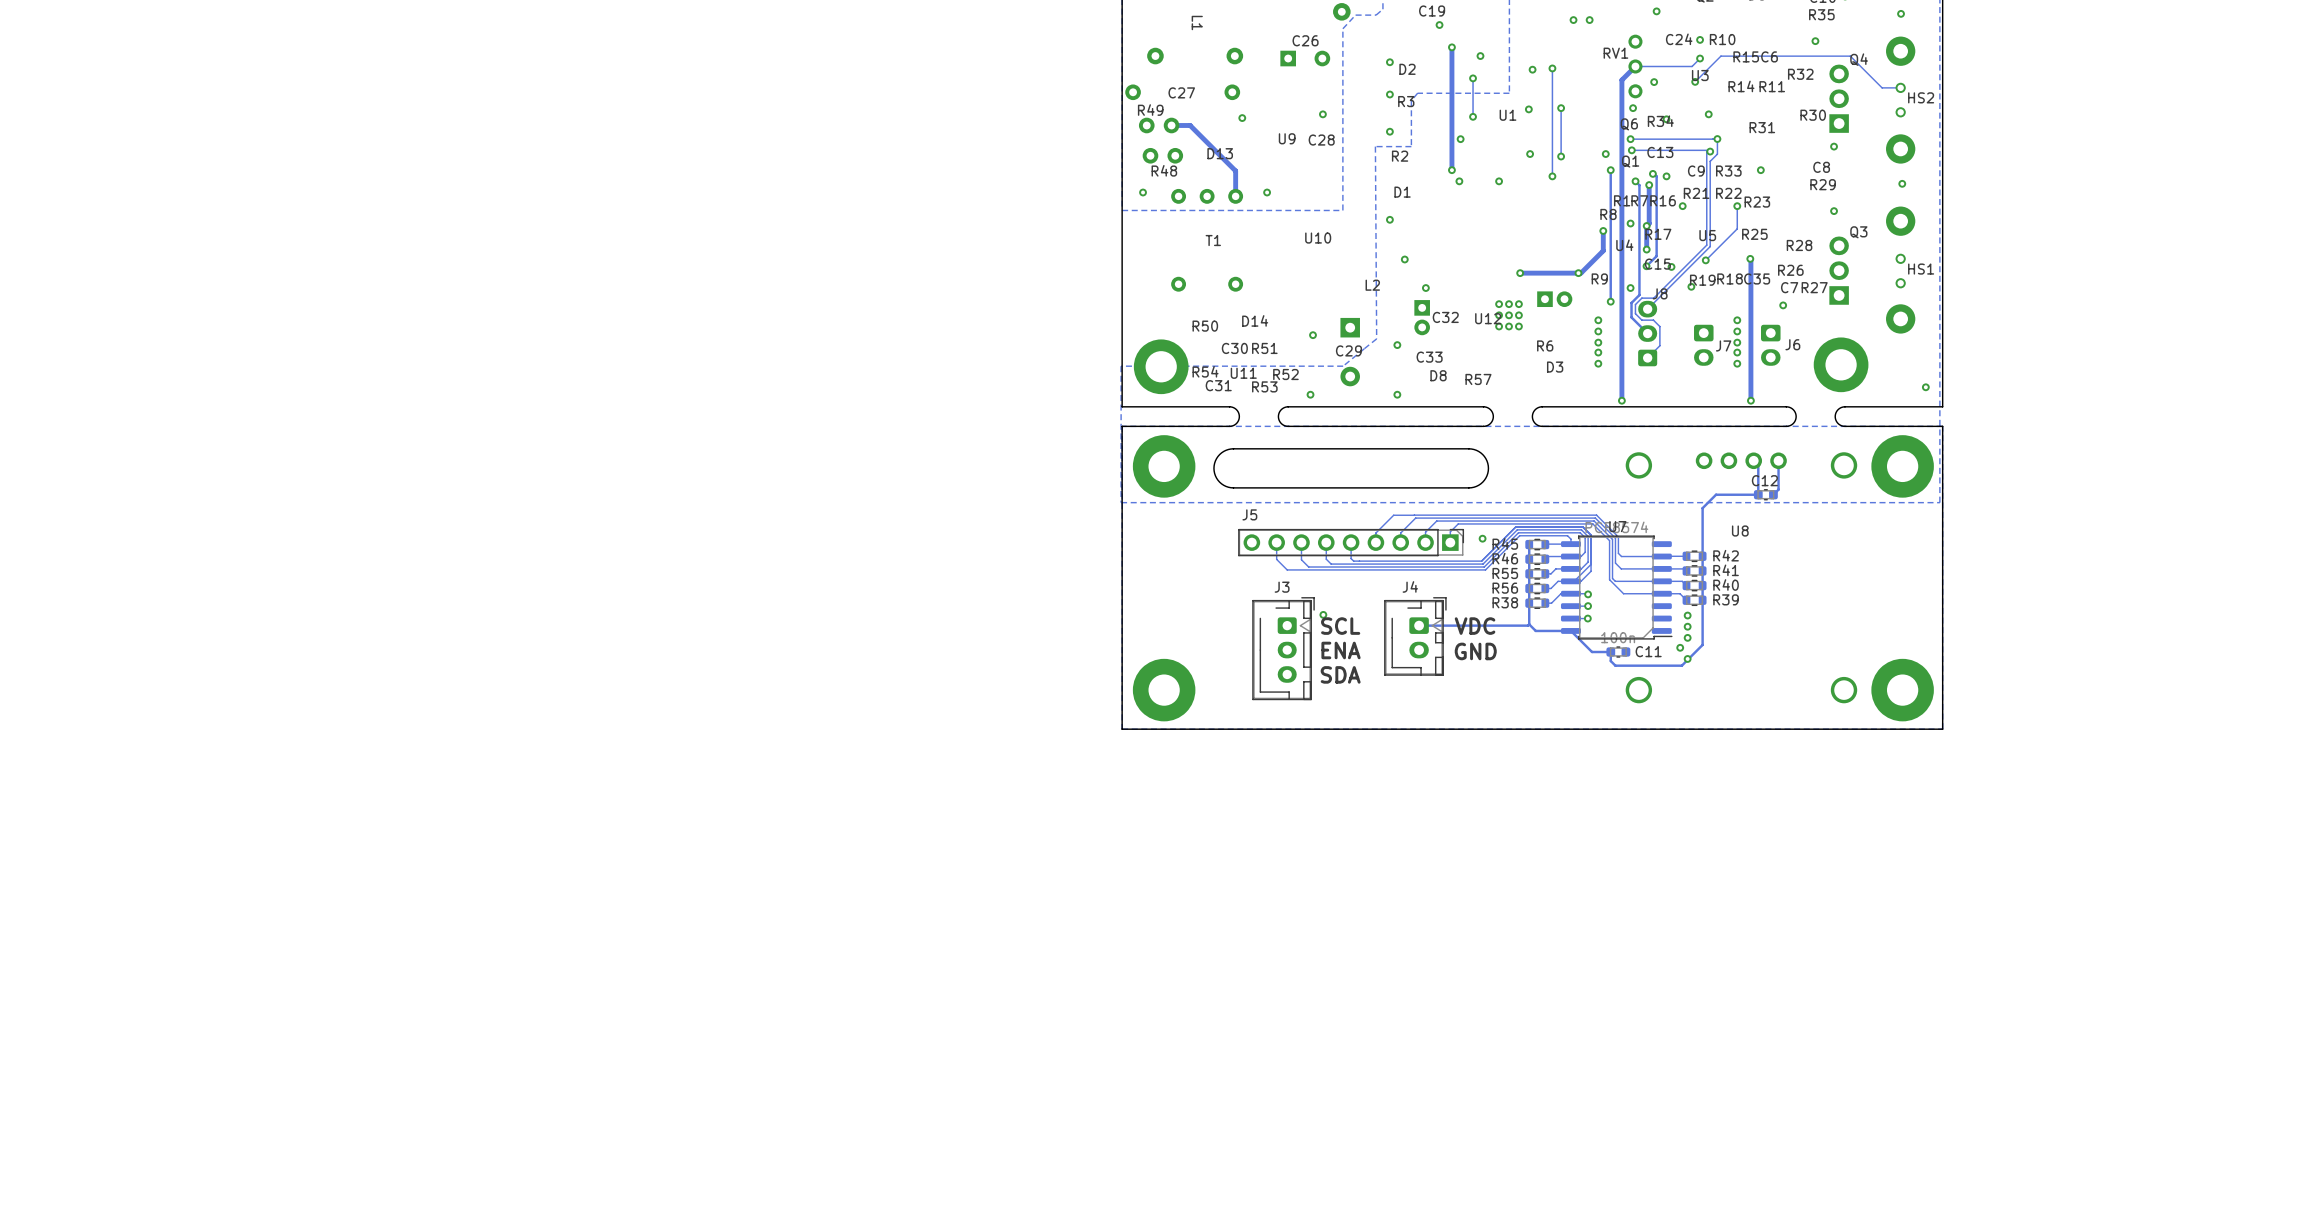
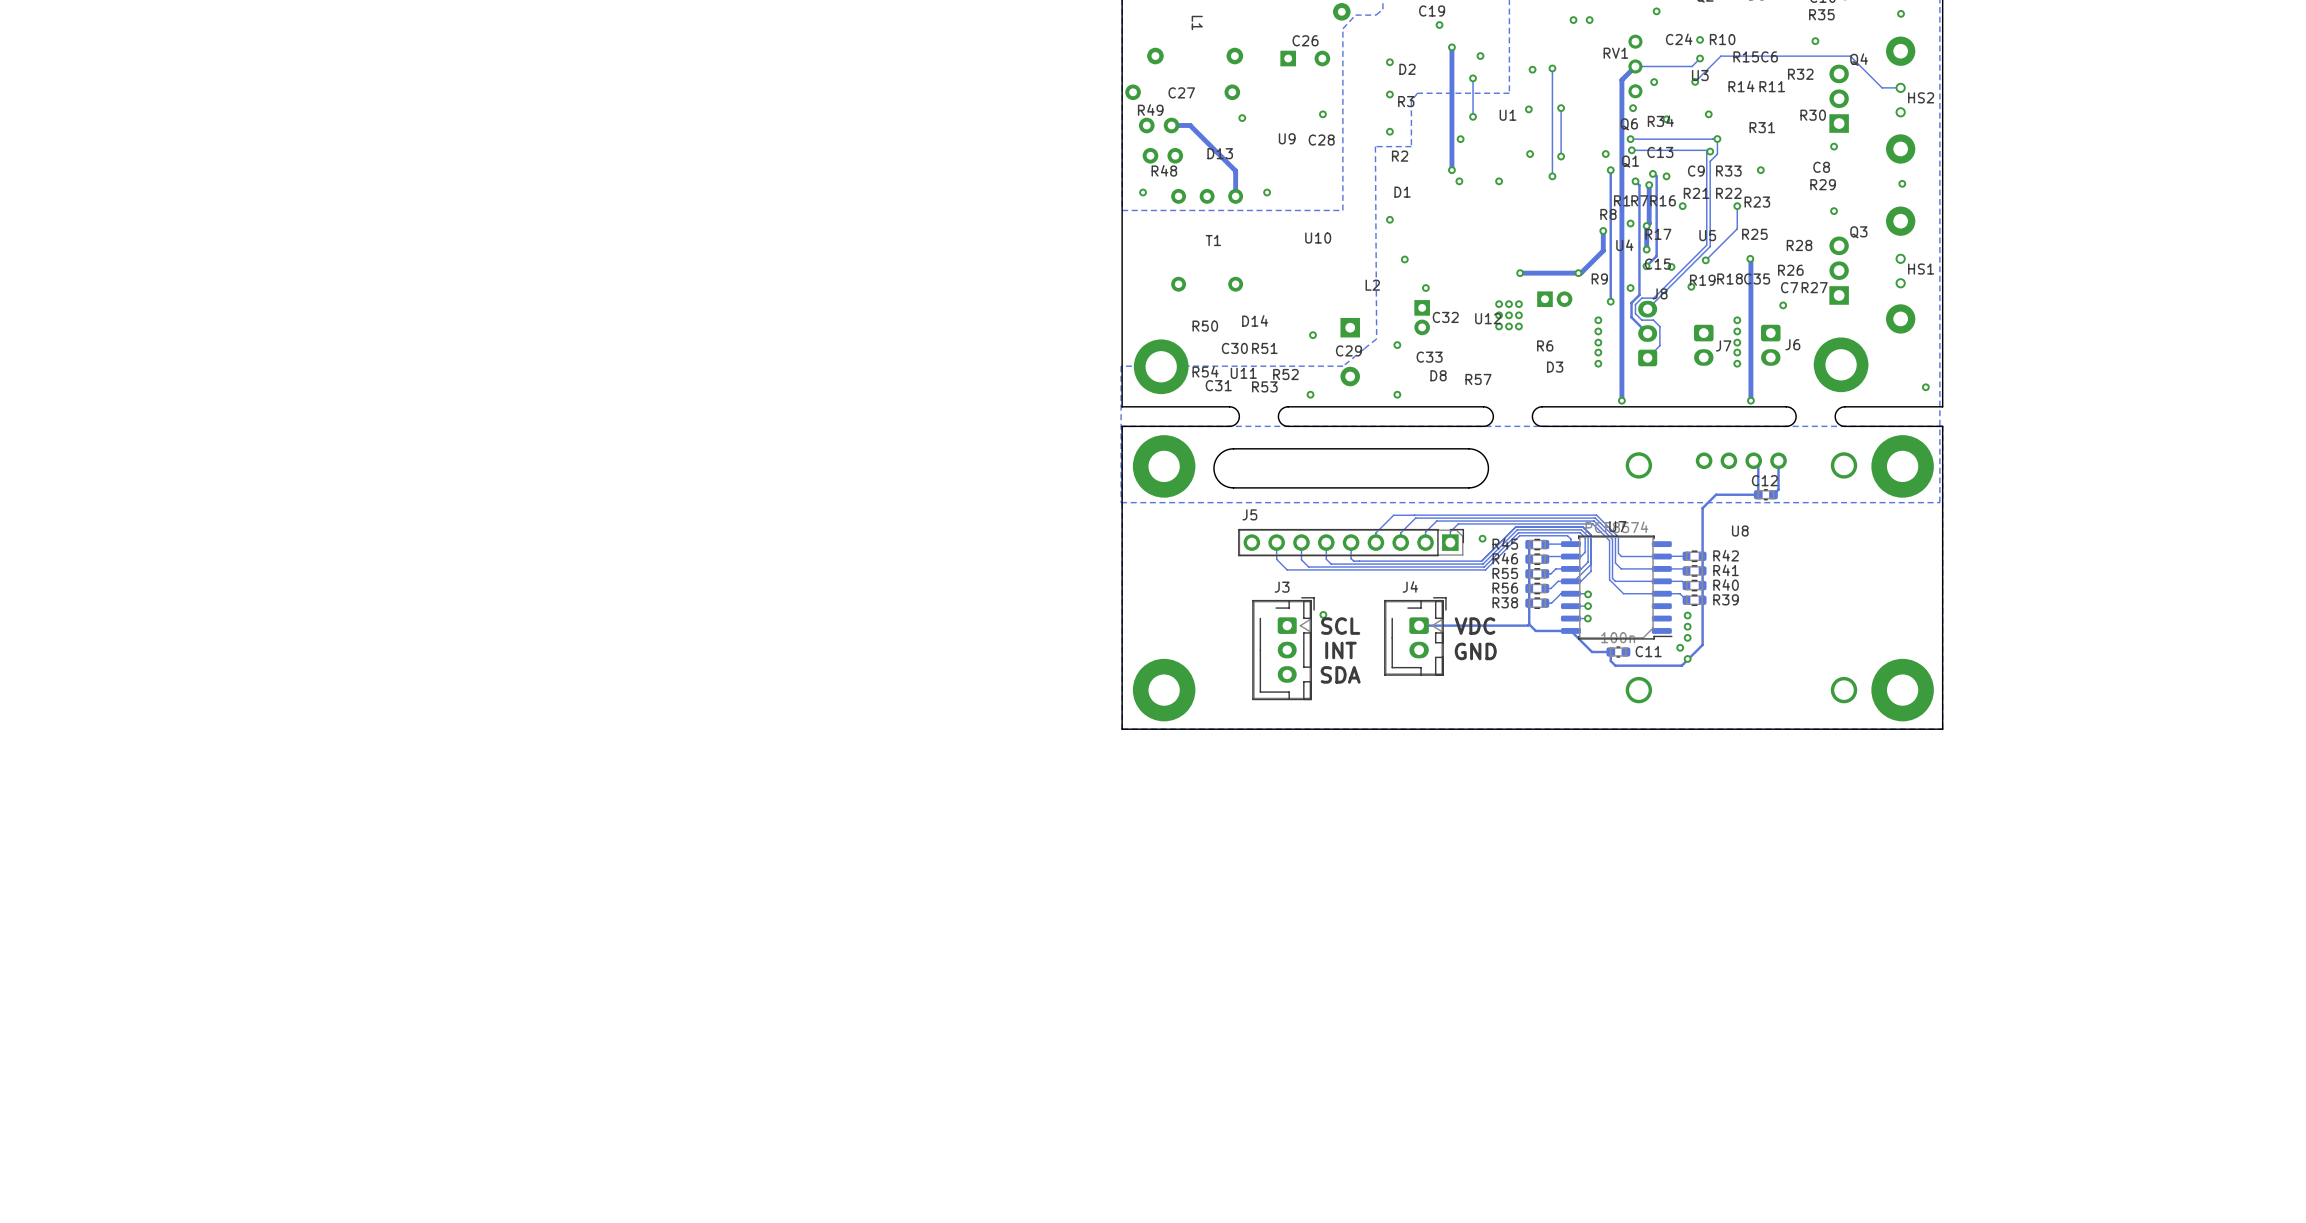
text: ENA (1341, 650) -> INT (1341, 650)

